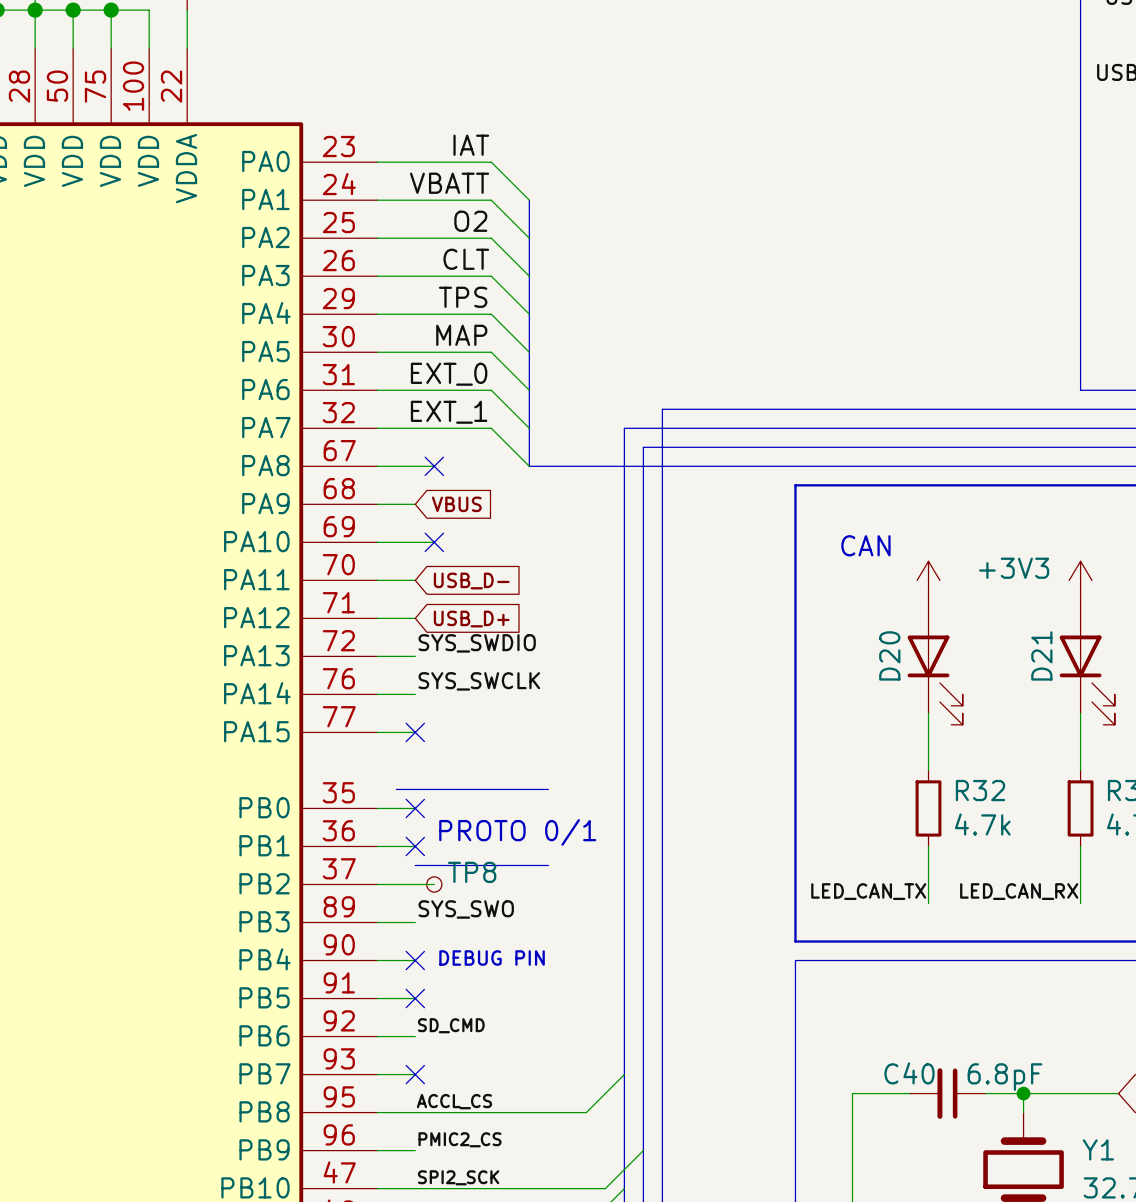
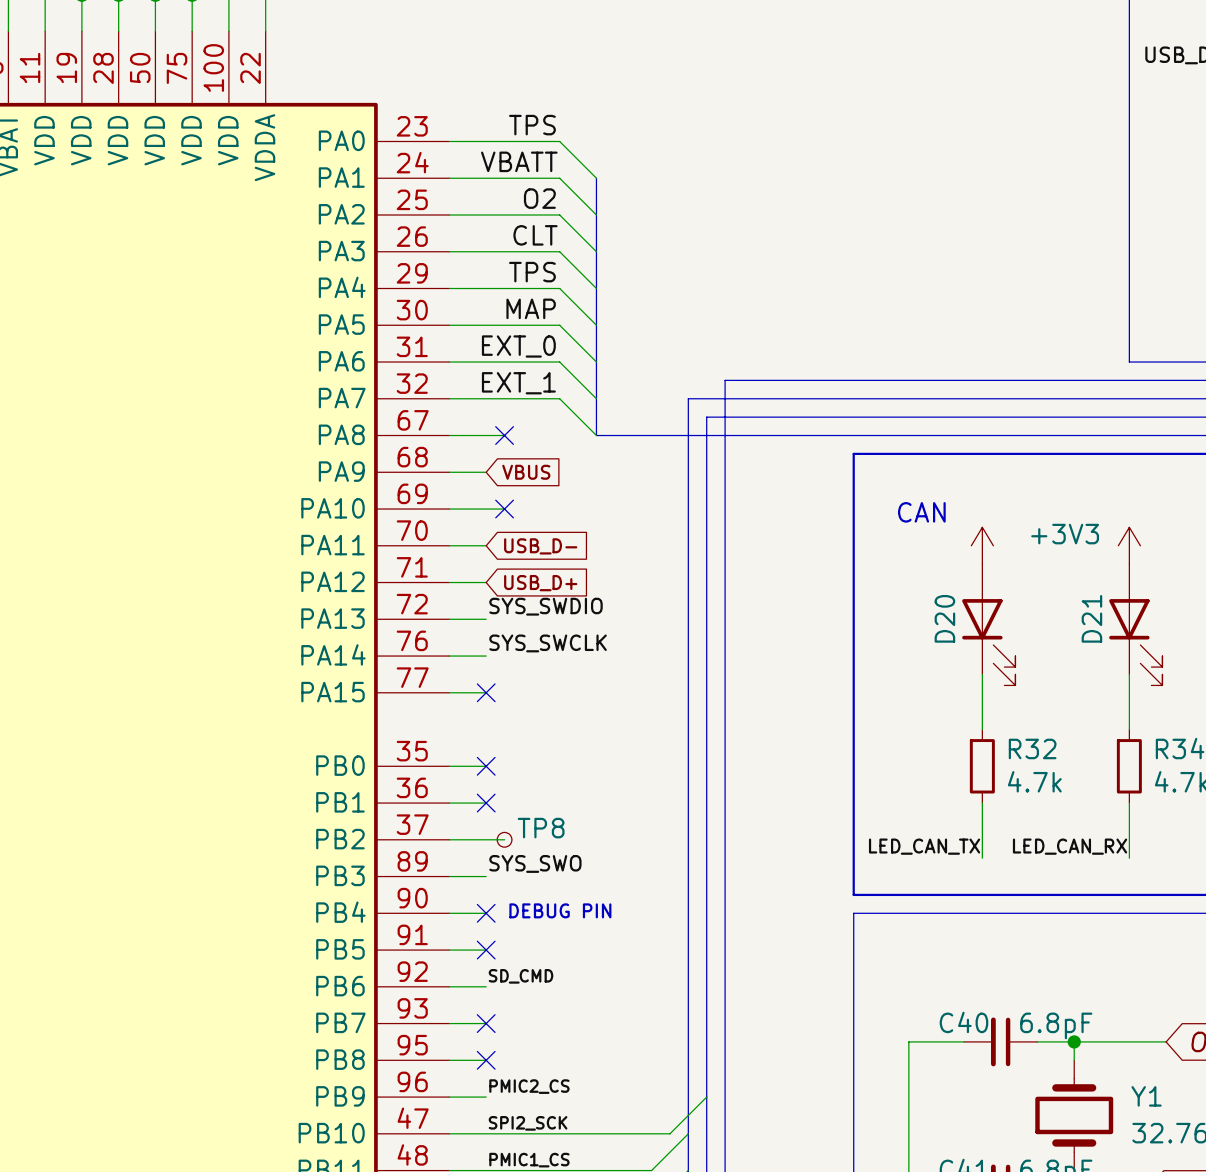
label: IAT (471, 145) -> TPS (532, 125)
line: (396, 789) (548, 789) -> none
text: PROTO 0/1 (517, 832) -> none
line: (415, 865) (548, 865) -> none
wire: (624, 1074) (586, 1112) (415, 1112) -> none
label: ACCL_CS (454, 1101) -> none
no-connect mark: none -> (486, 1060)

